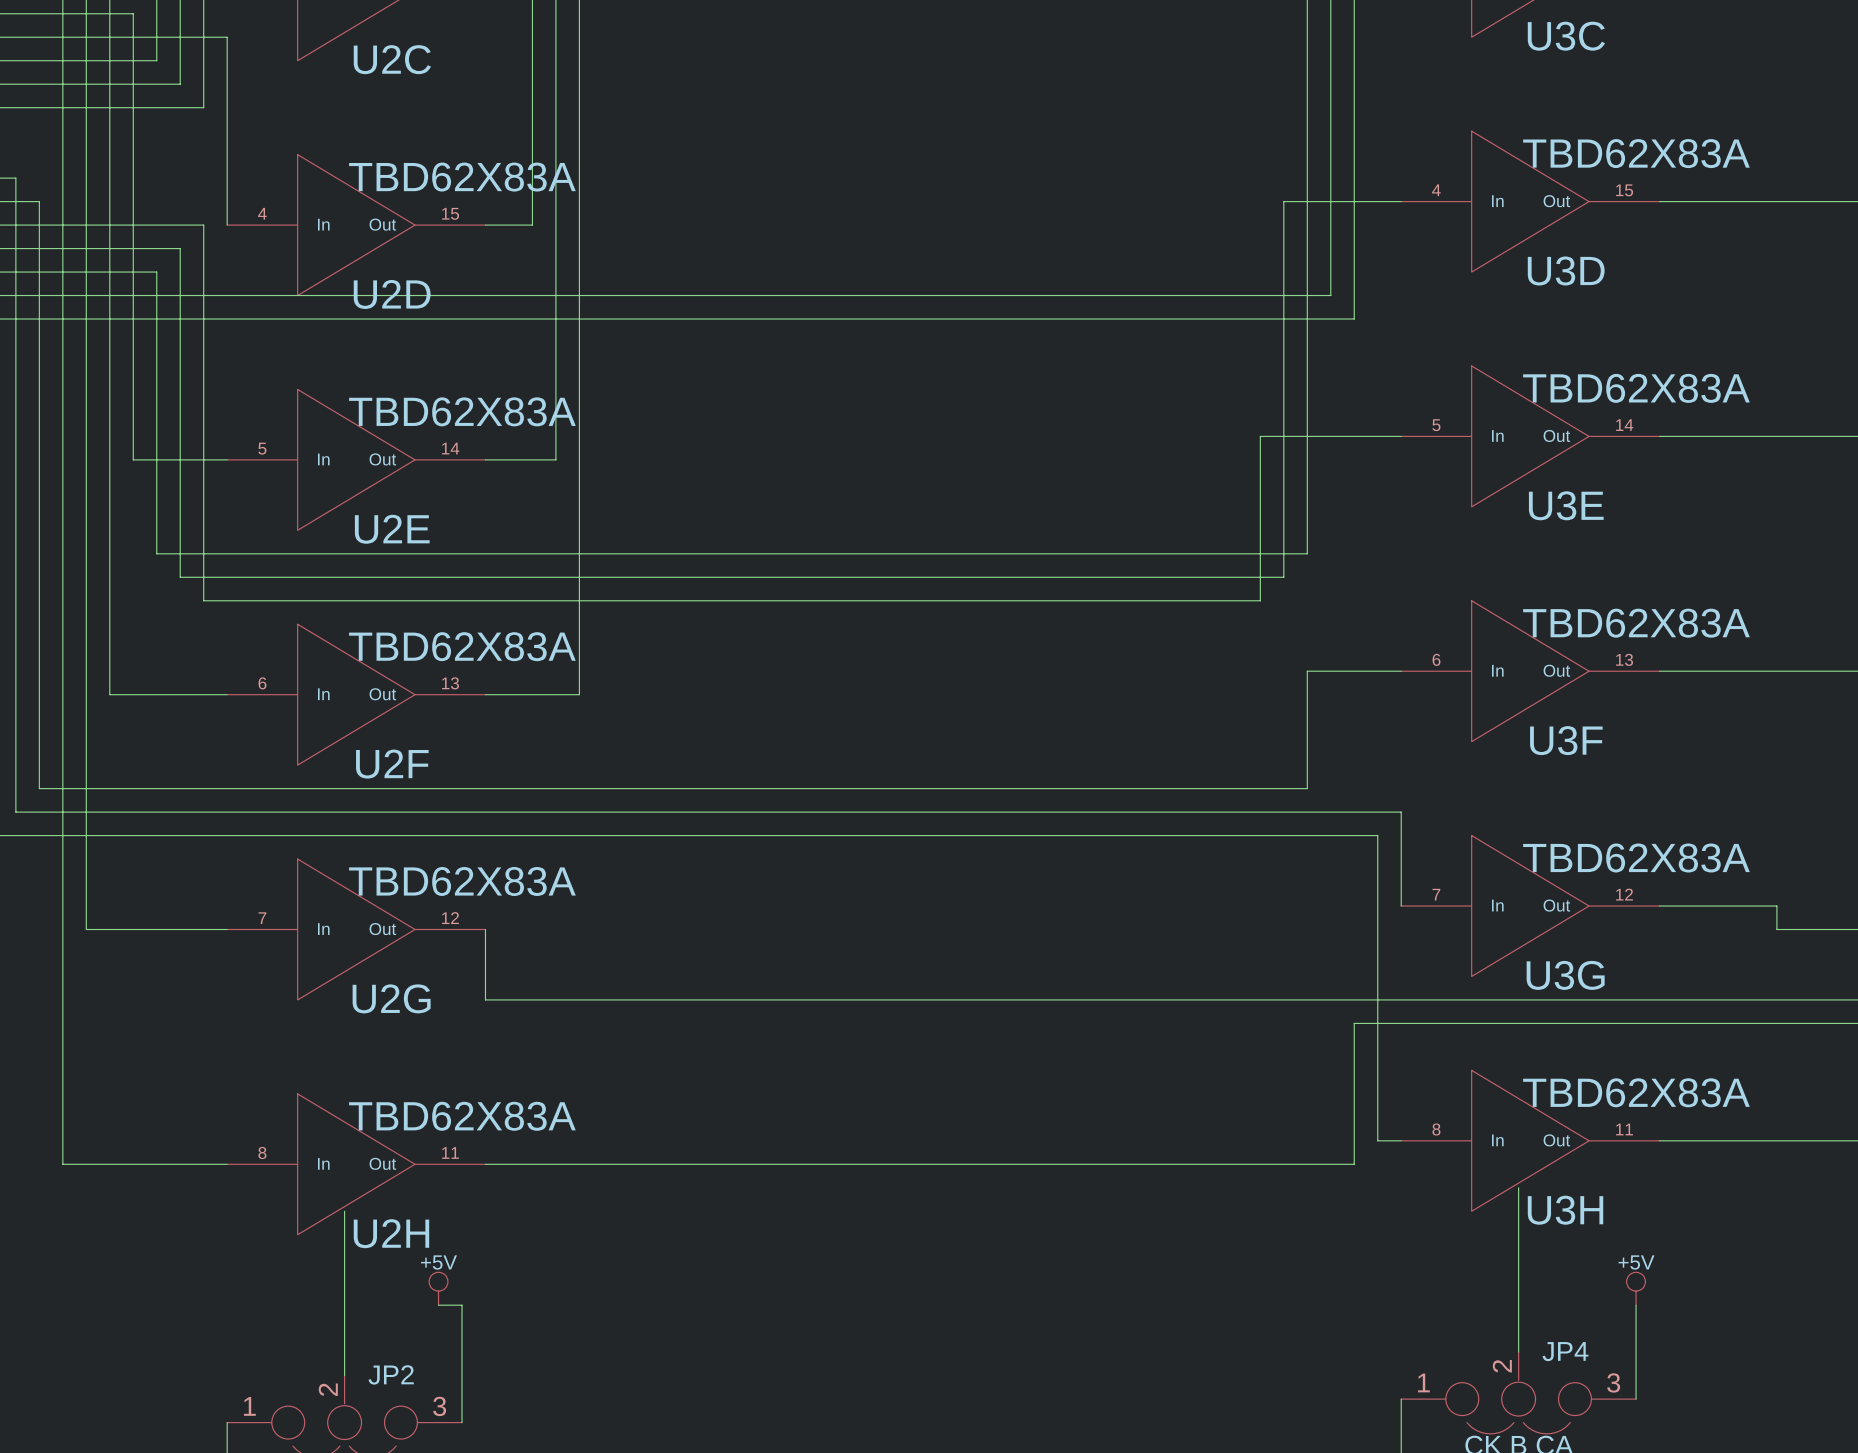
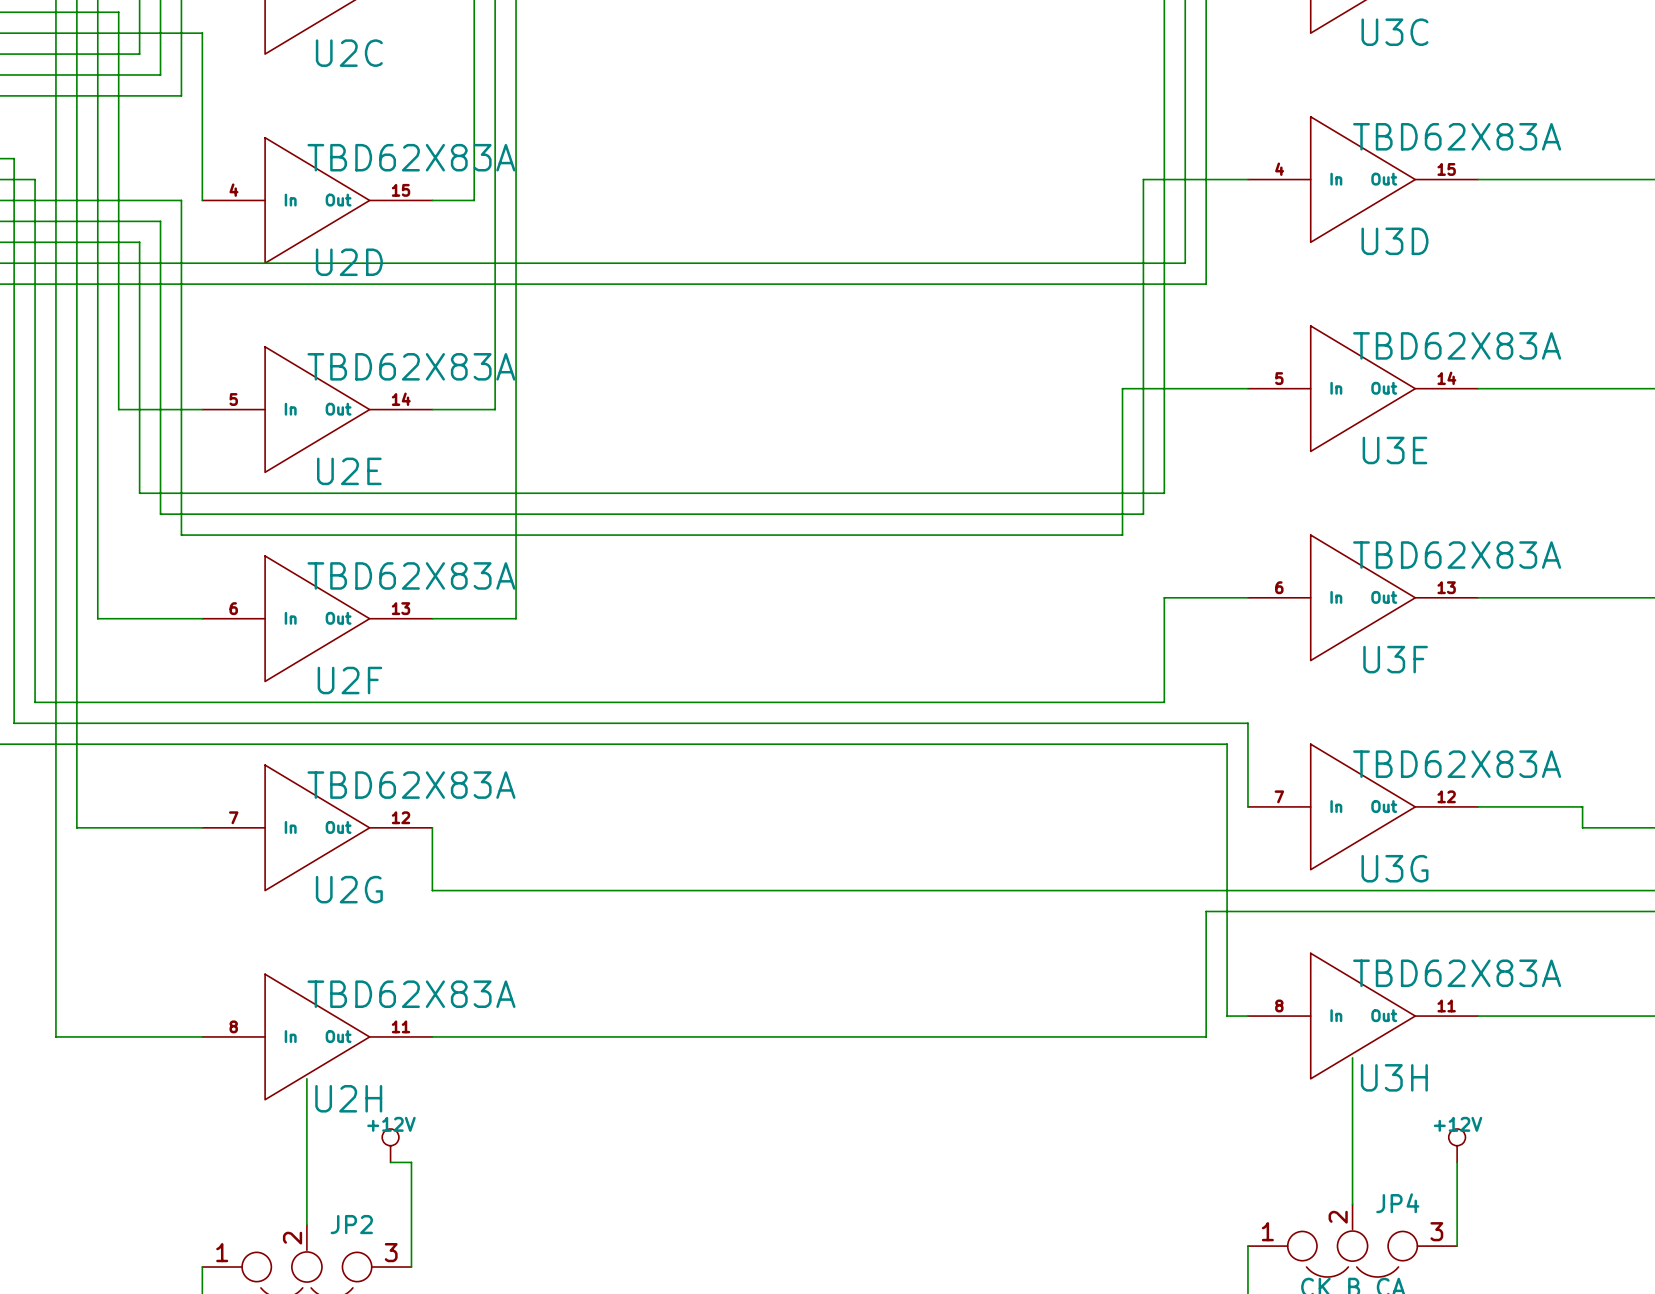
power symbol: +5V (438, 1288) -> +12V (390, 1145)
power symbol: +5V (1636, 1288) -> +12V (1457, 1145)

